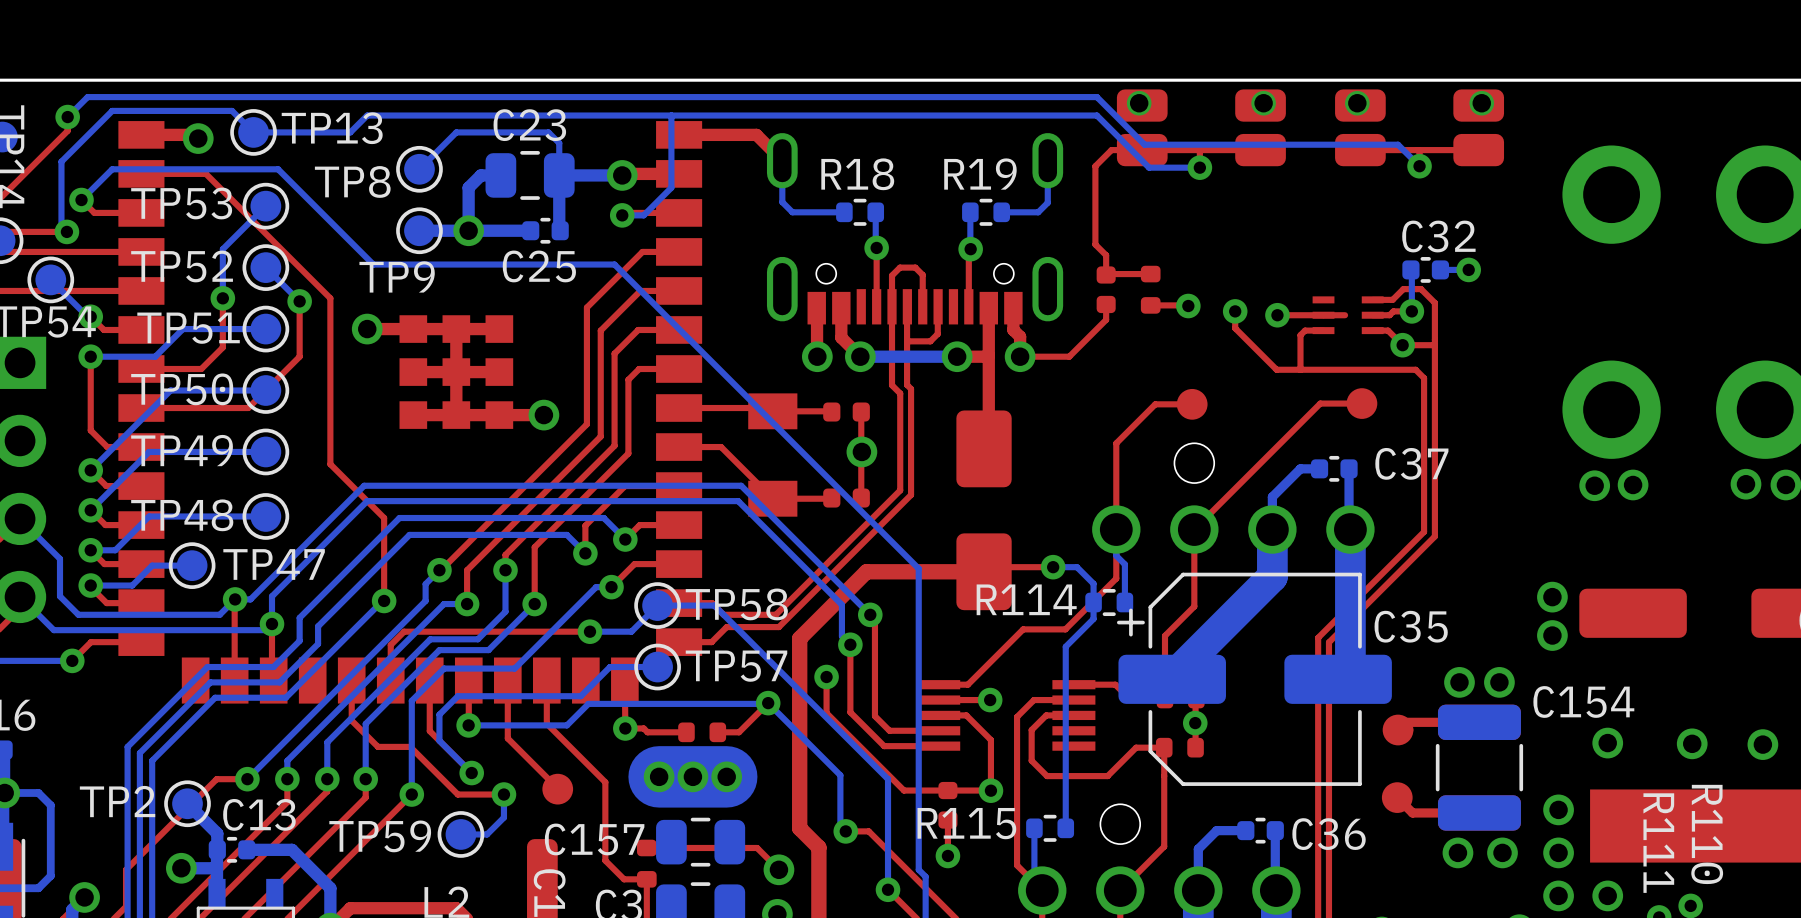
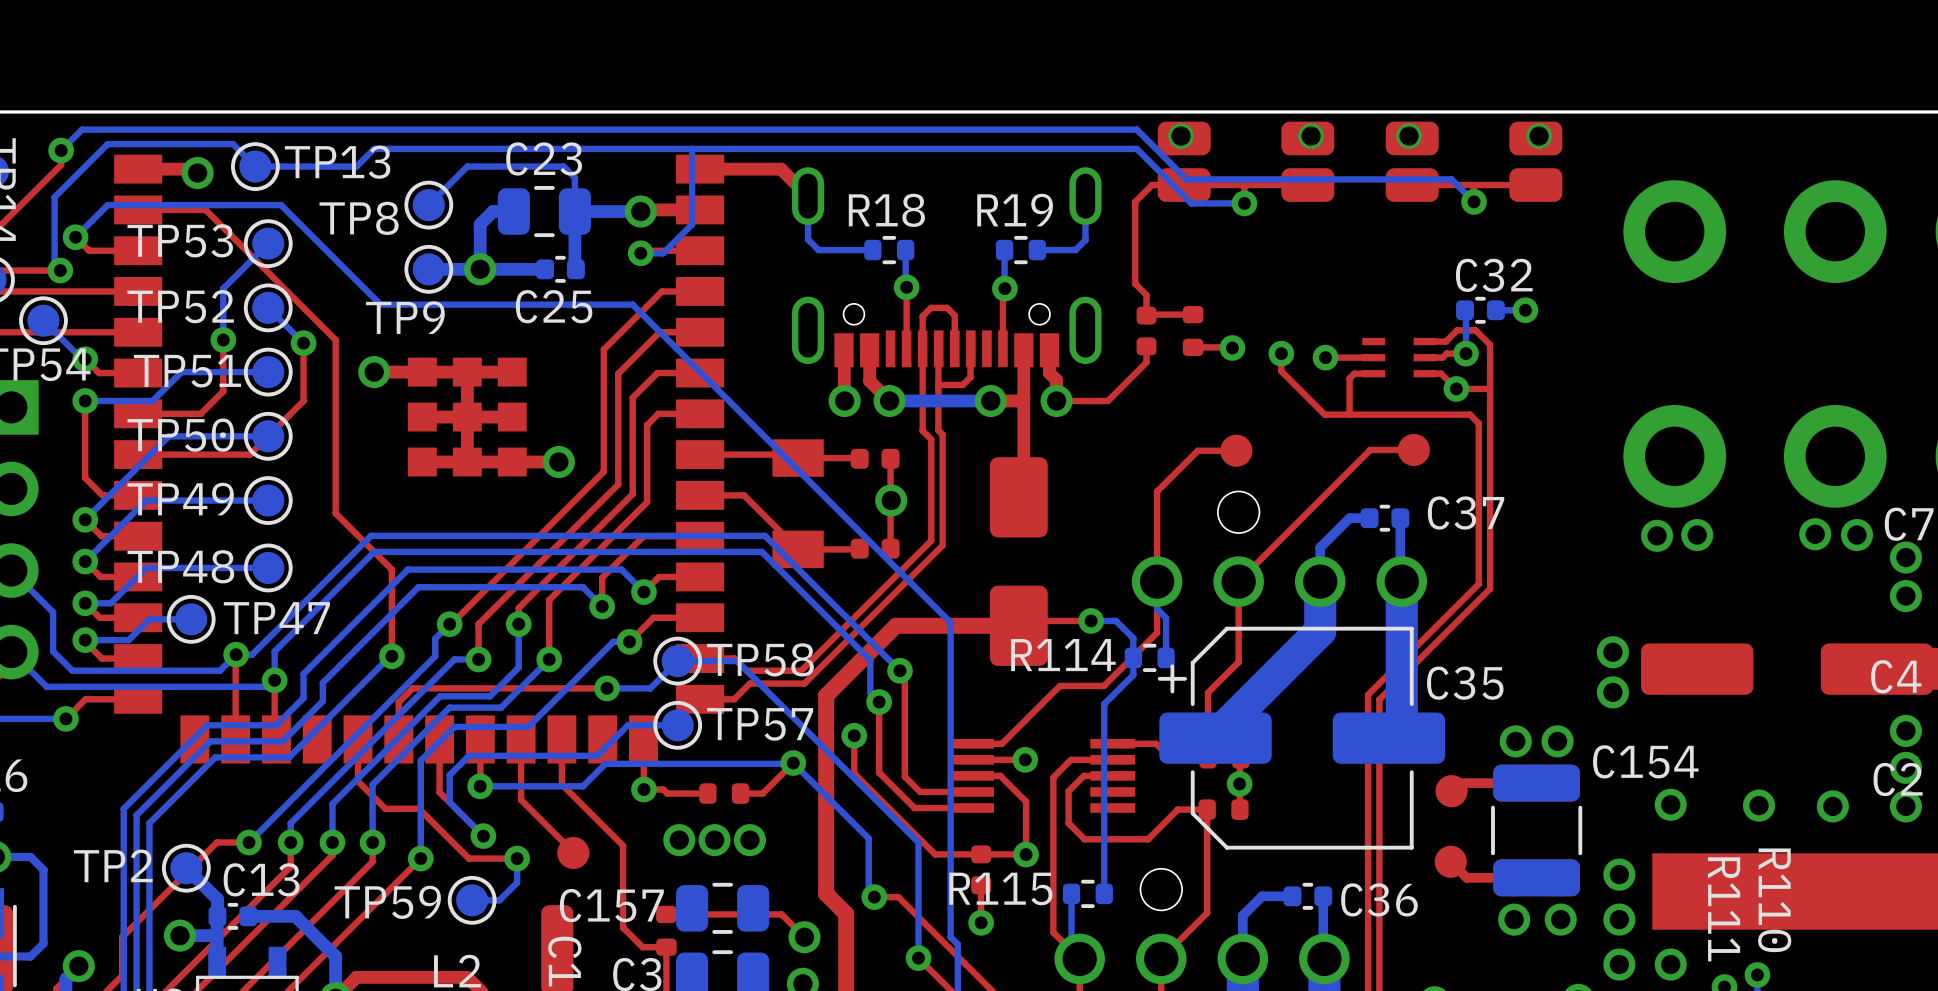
top track: (1345, 315) (1323, 315) -> none
bottom track: (726, 776) (659, 776) -> none

